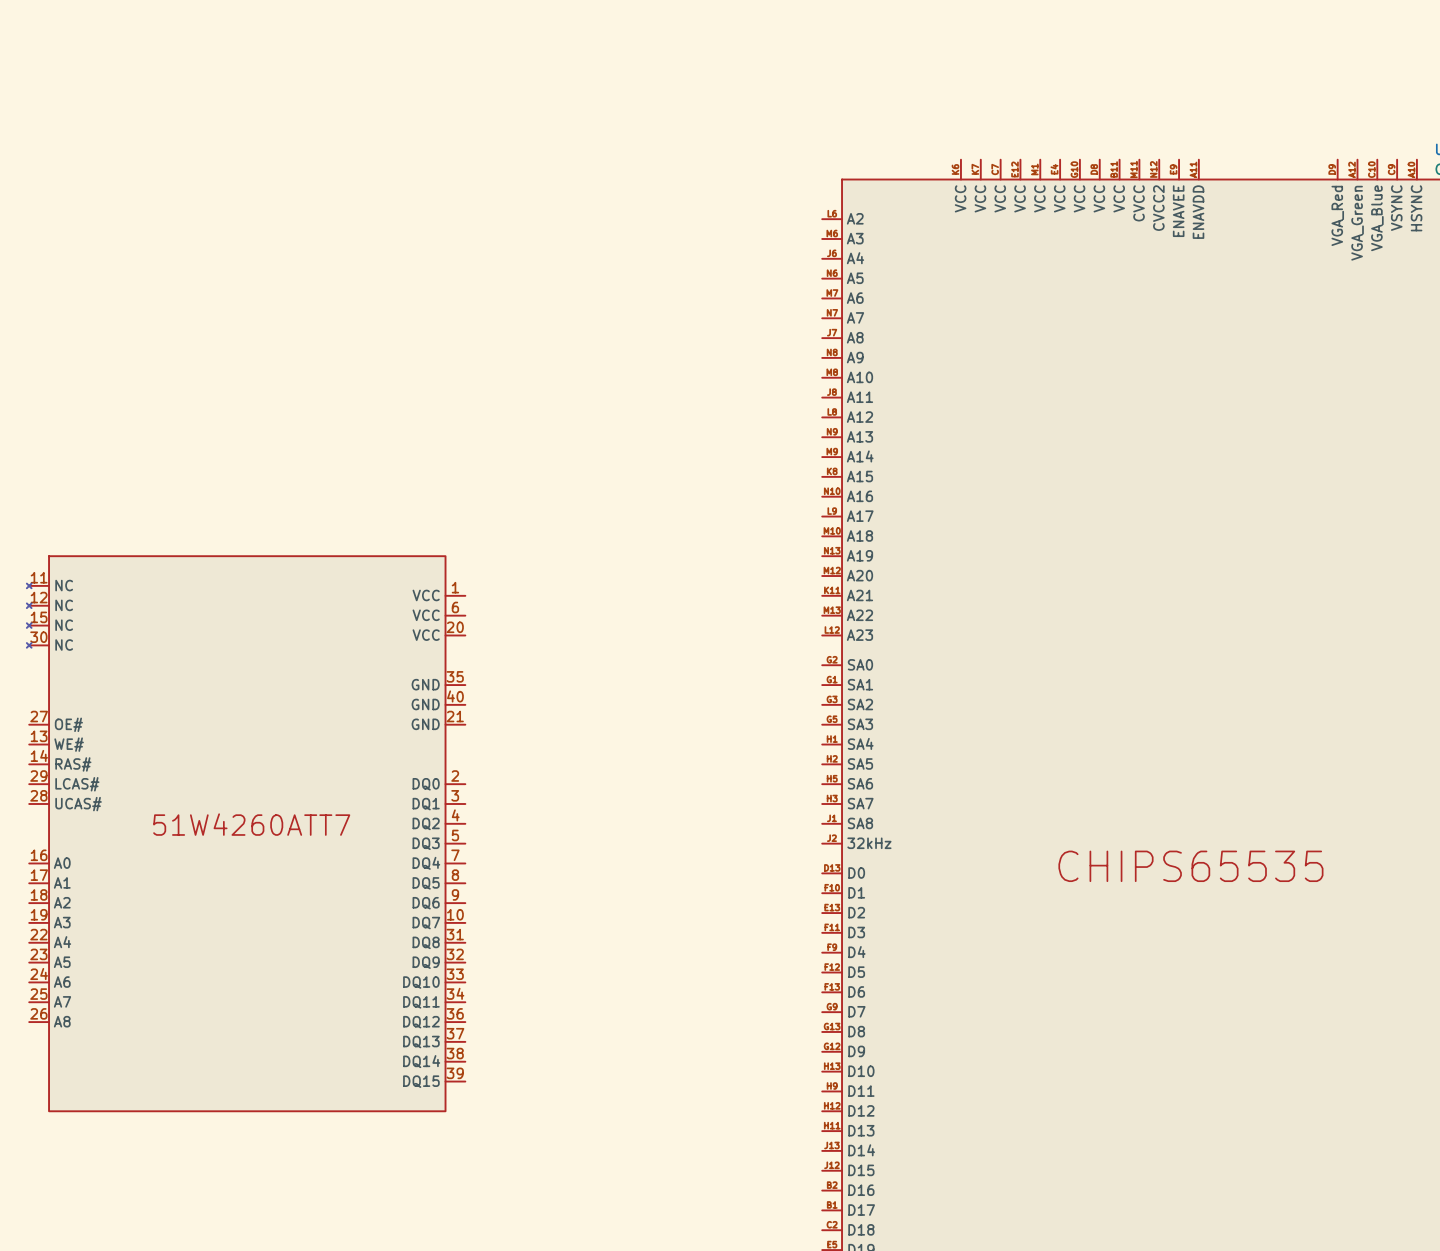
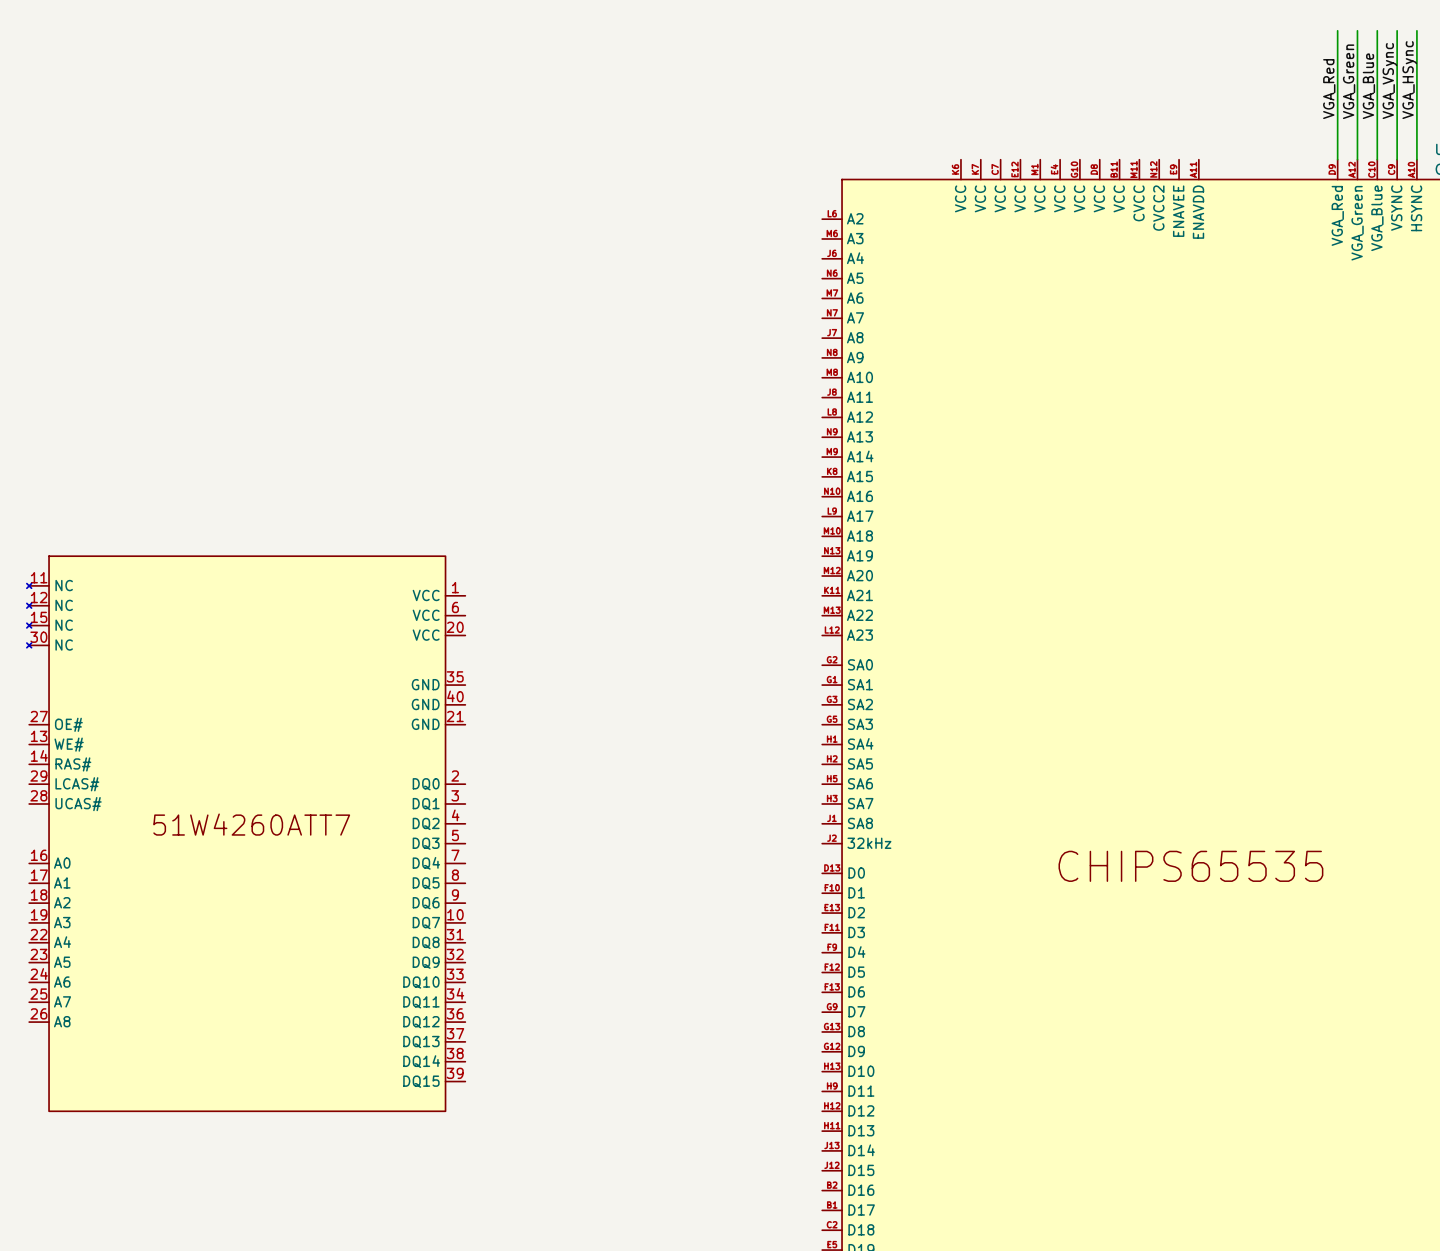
wire: none -> (1337, 30) (1337, 159)
wire: none -> (1357, 30) (1357, 159)
wire: none -> (1377, 30) (1377, 159)
wire: none -> (1397, 30) (1397, 159)
wire: none -> (1416, 30) (1416, 159)
label: none -> VGA_HSync (1409, 80)
label: none -> VGA_Green (1349, 81)
label: none -> VGA_VSync (1389, 81)
label: none -> VGA_Blue (1368, 86)
label: none -> VGA_Red (1329, 89)

